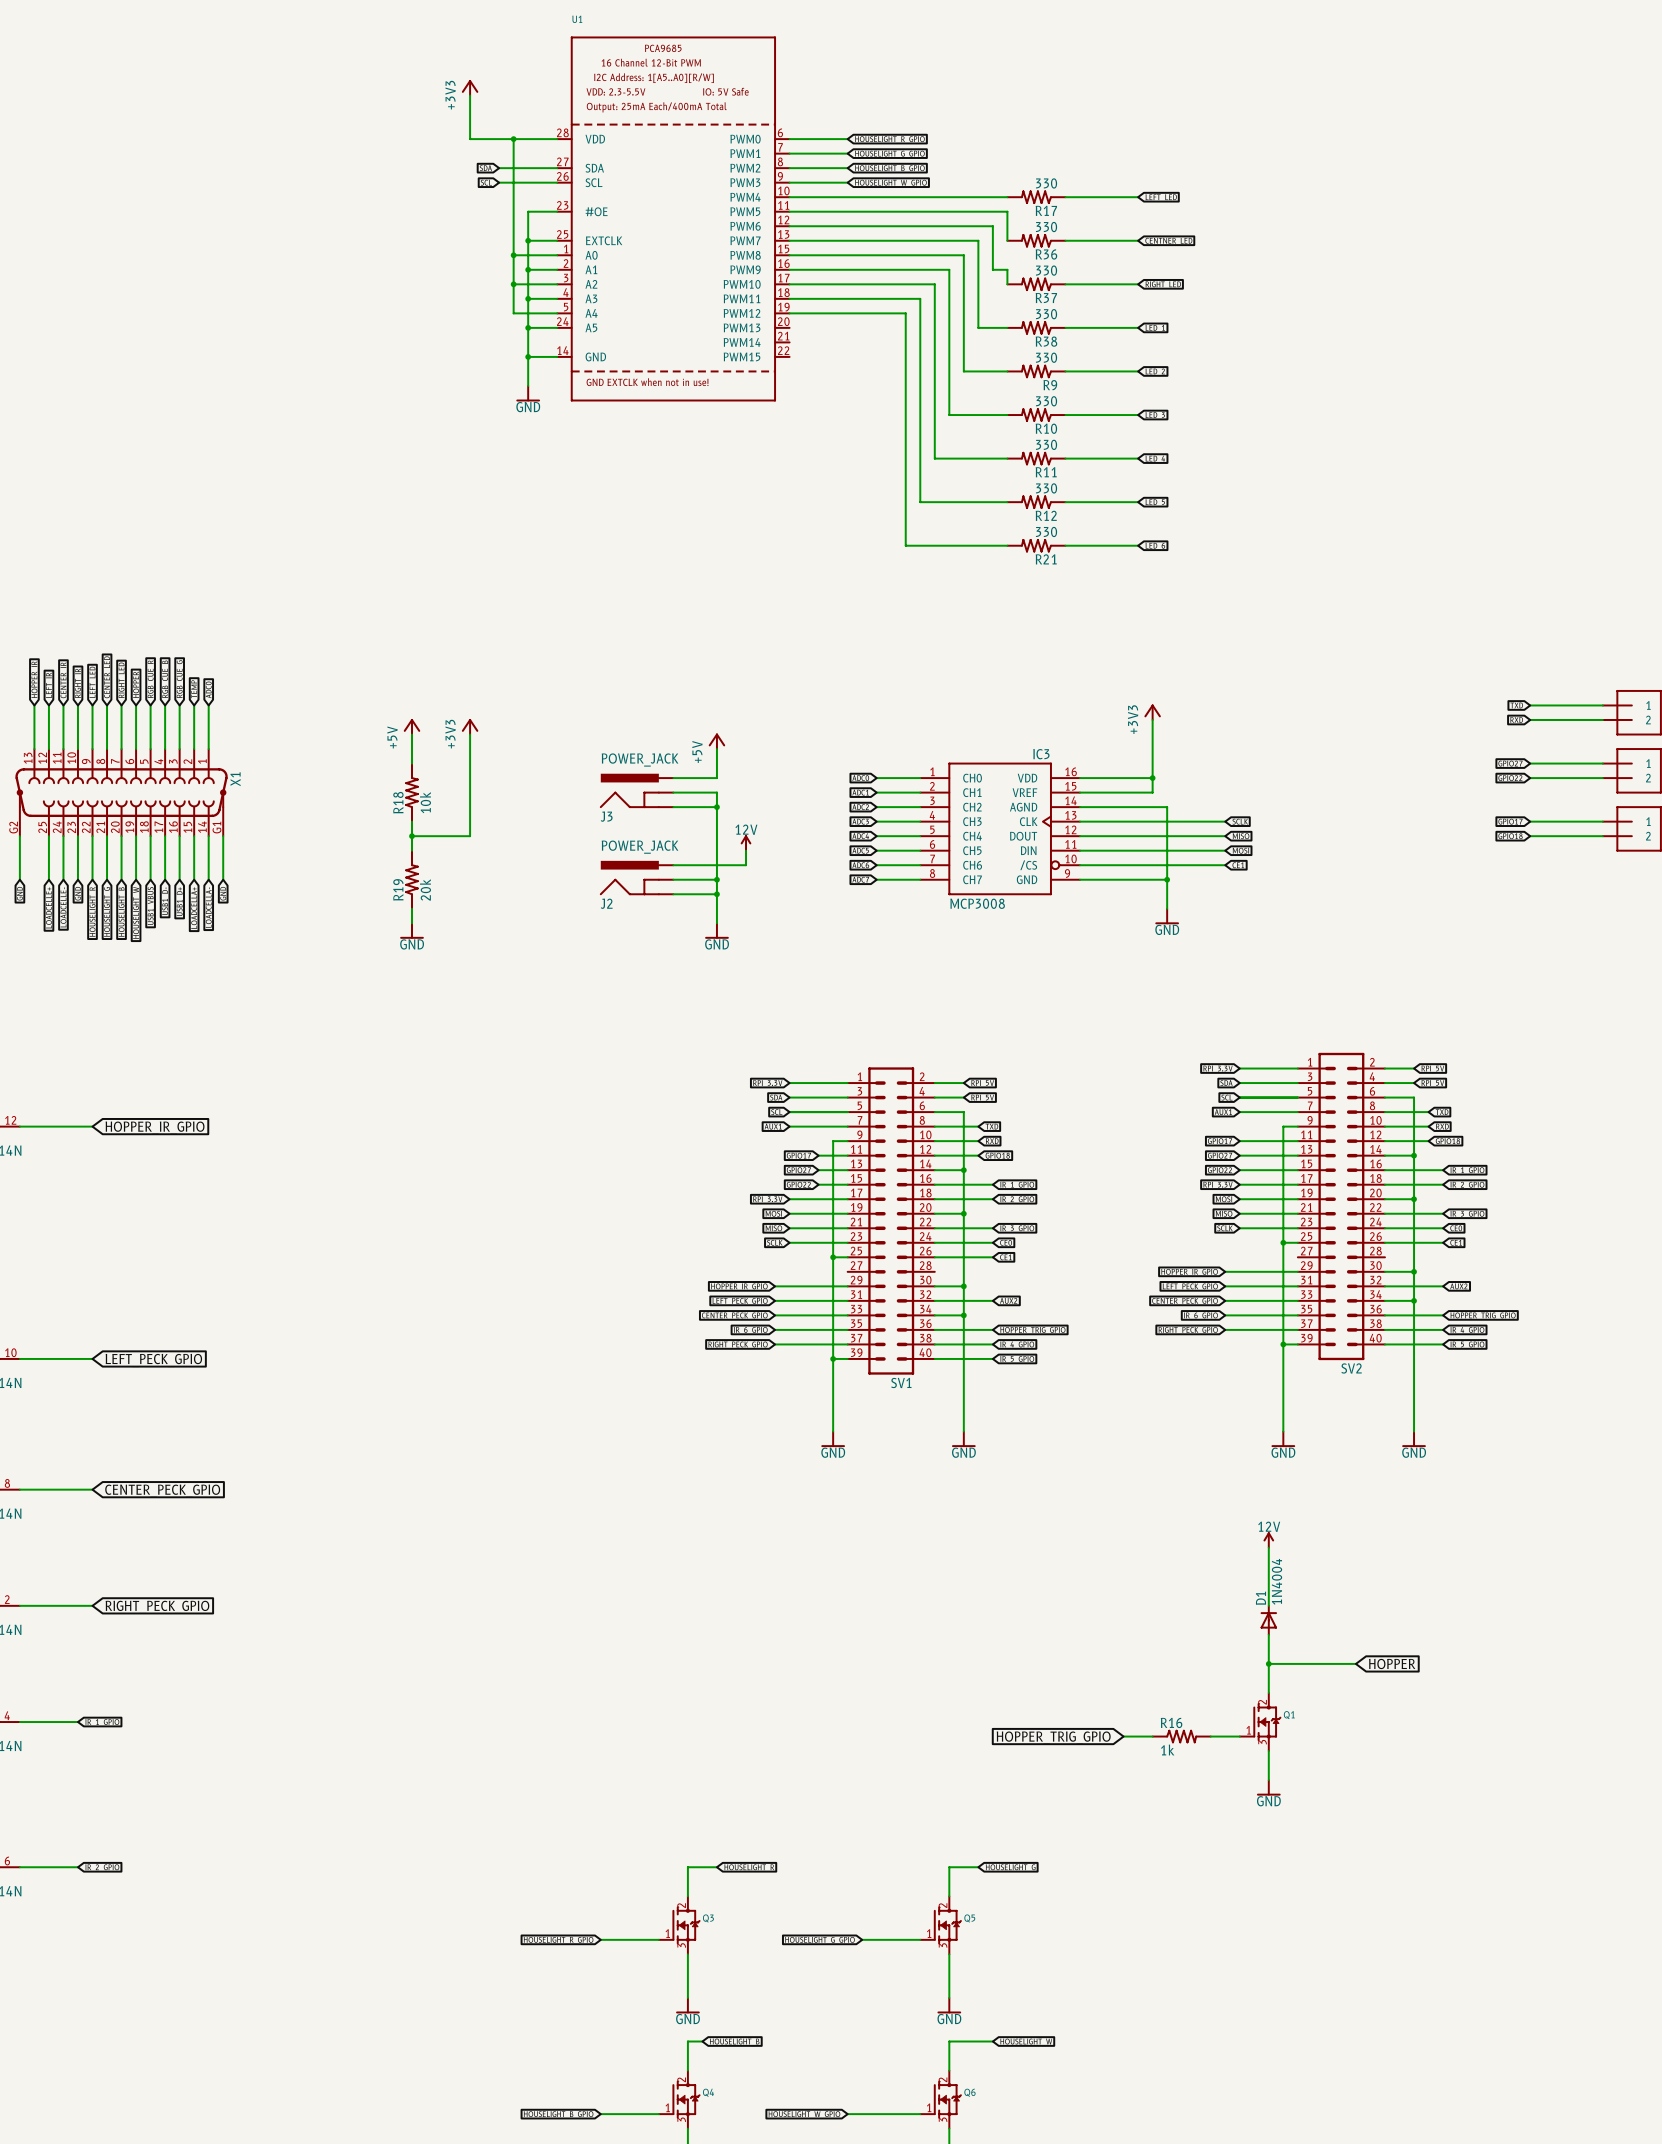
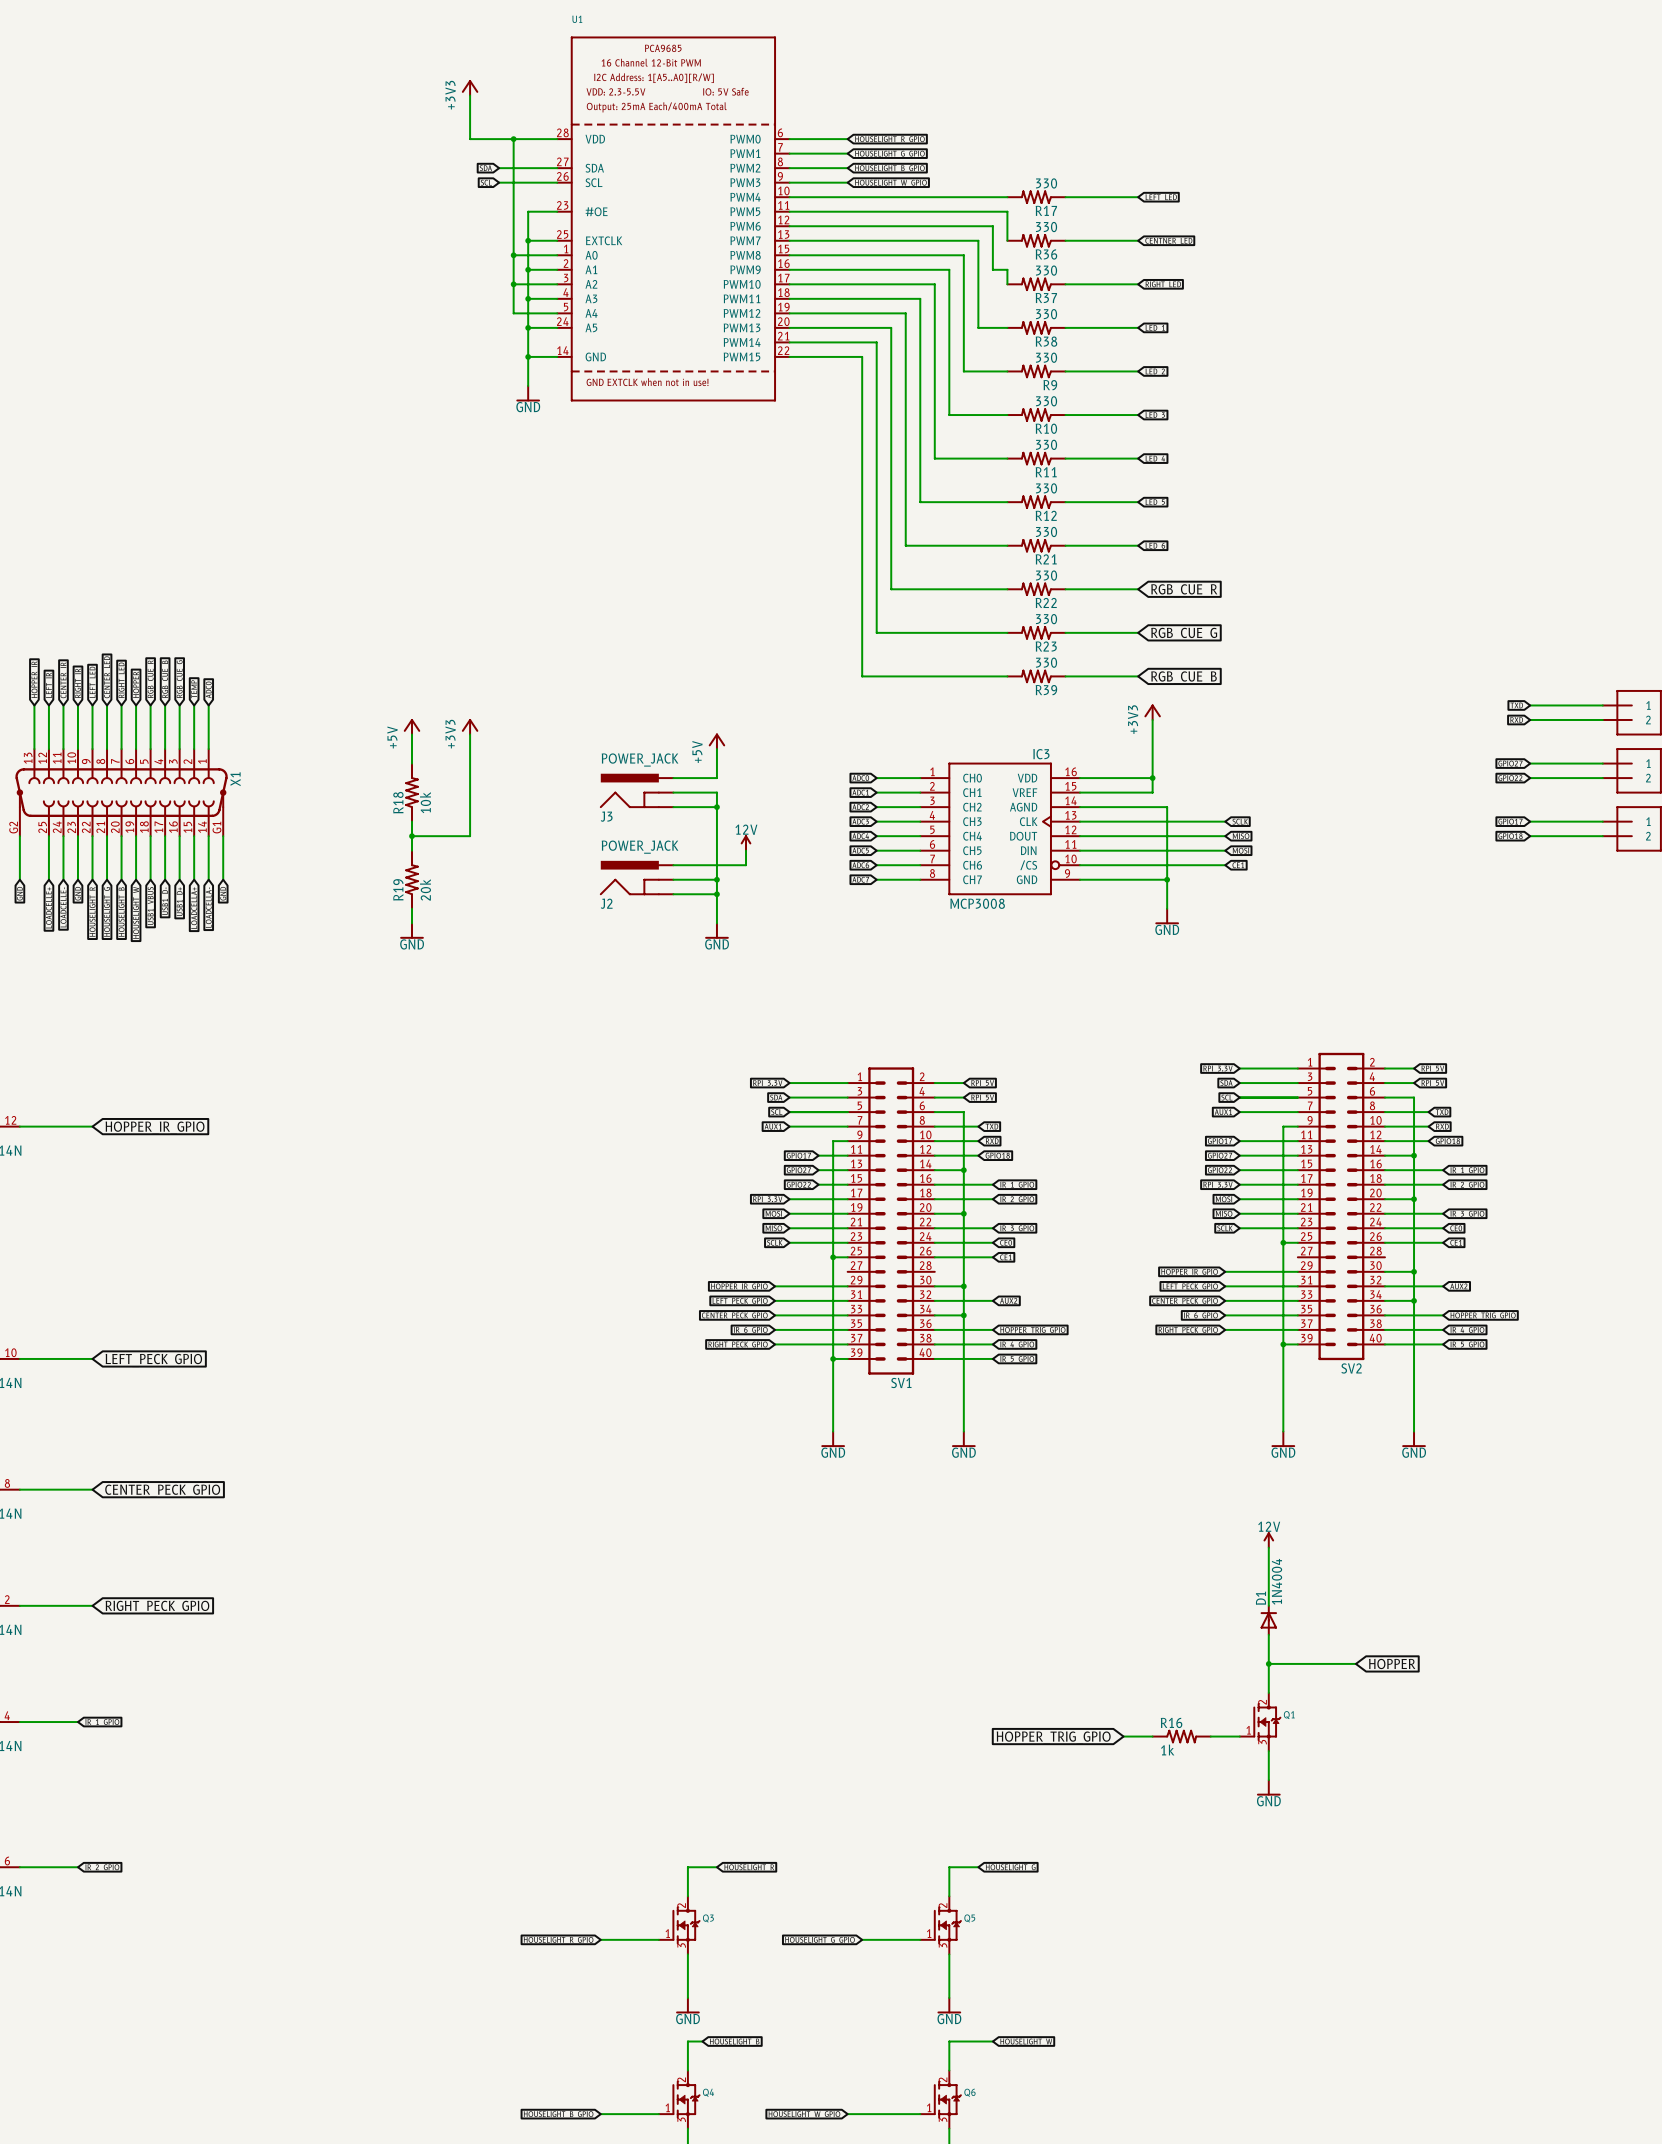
wire: none -> (789, 327) (891, 327) (891, 589) (1007, 589)
wire: none -> (789, 342) (876, 342) (876, 632) (1007, 632)
wire: none -> (789, 356) (862, 356) (862, 676) (1007, 676)
R22: none -> 330 (1036, 589)
wire: none -> (1065, 589) (1138, 589)
global label: none -> RGB_CUE_R (1184, 590)
R23: none -> 330 (1036, 632)
wire: none -> (1065, 632) (1138, 632)
global label: none -> RGB_CUE_G (1184, 634)
R39: none -> 330 (1036, 676)
wire: none -> (1065, 676) (1138, 676)
global label: none -> RGB_CUE_B (1184, 677)

